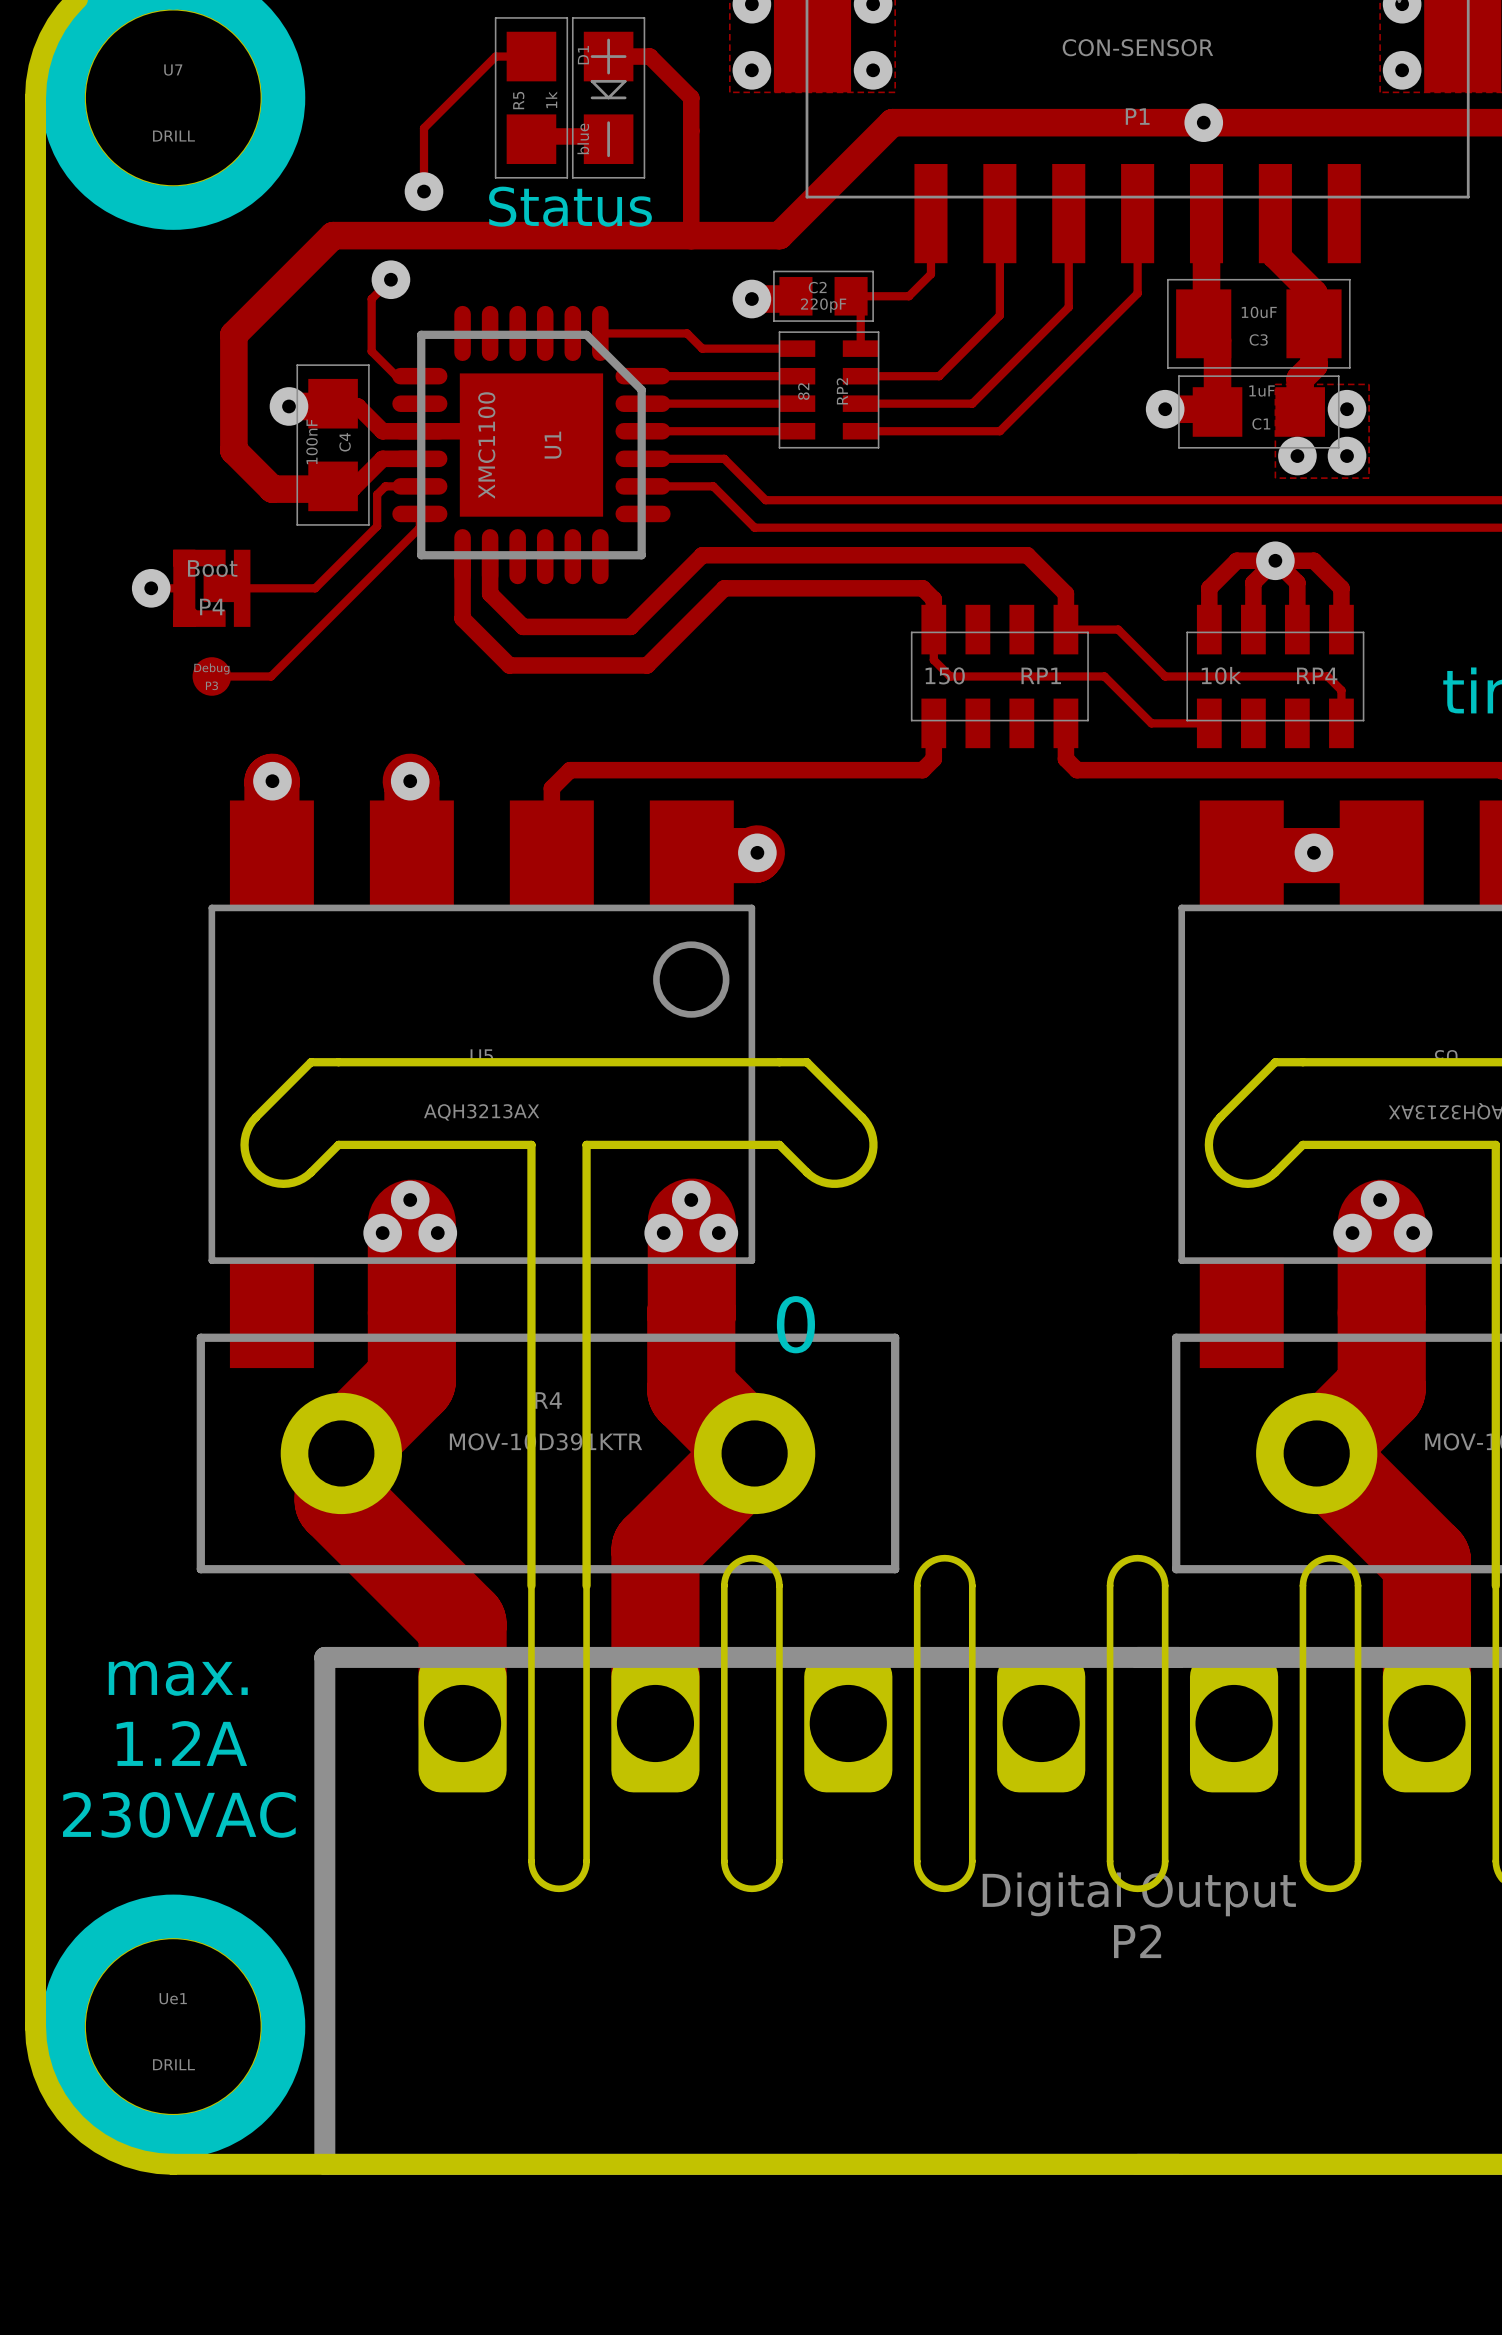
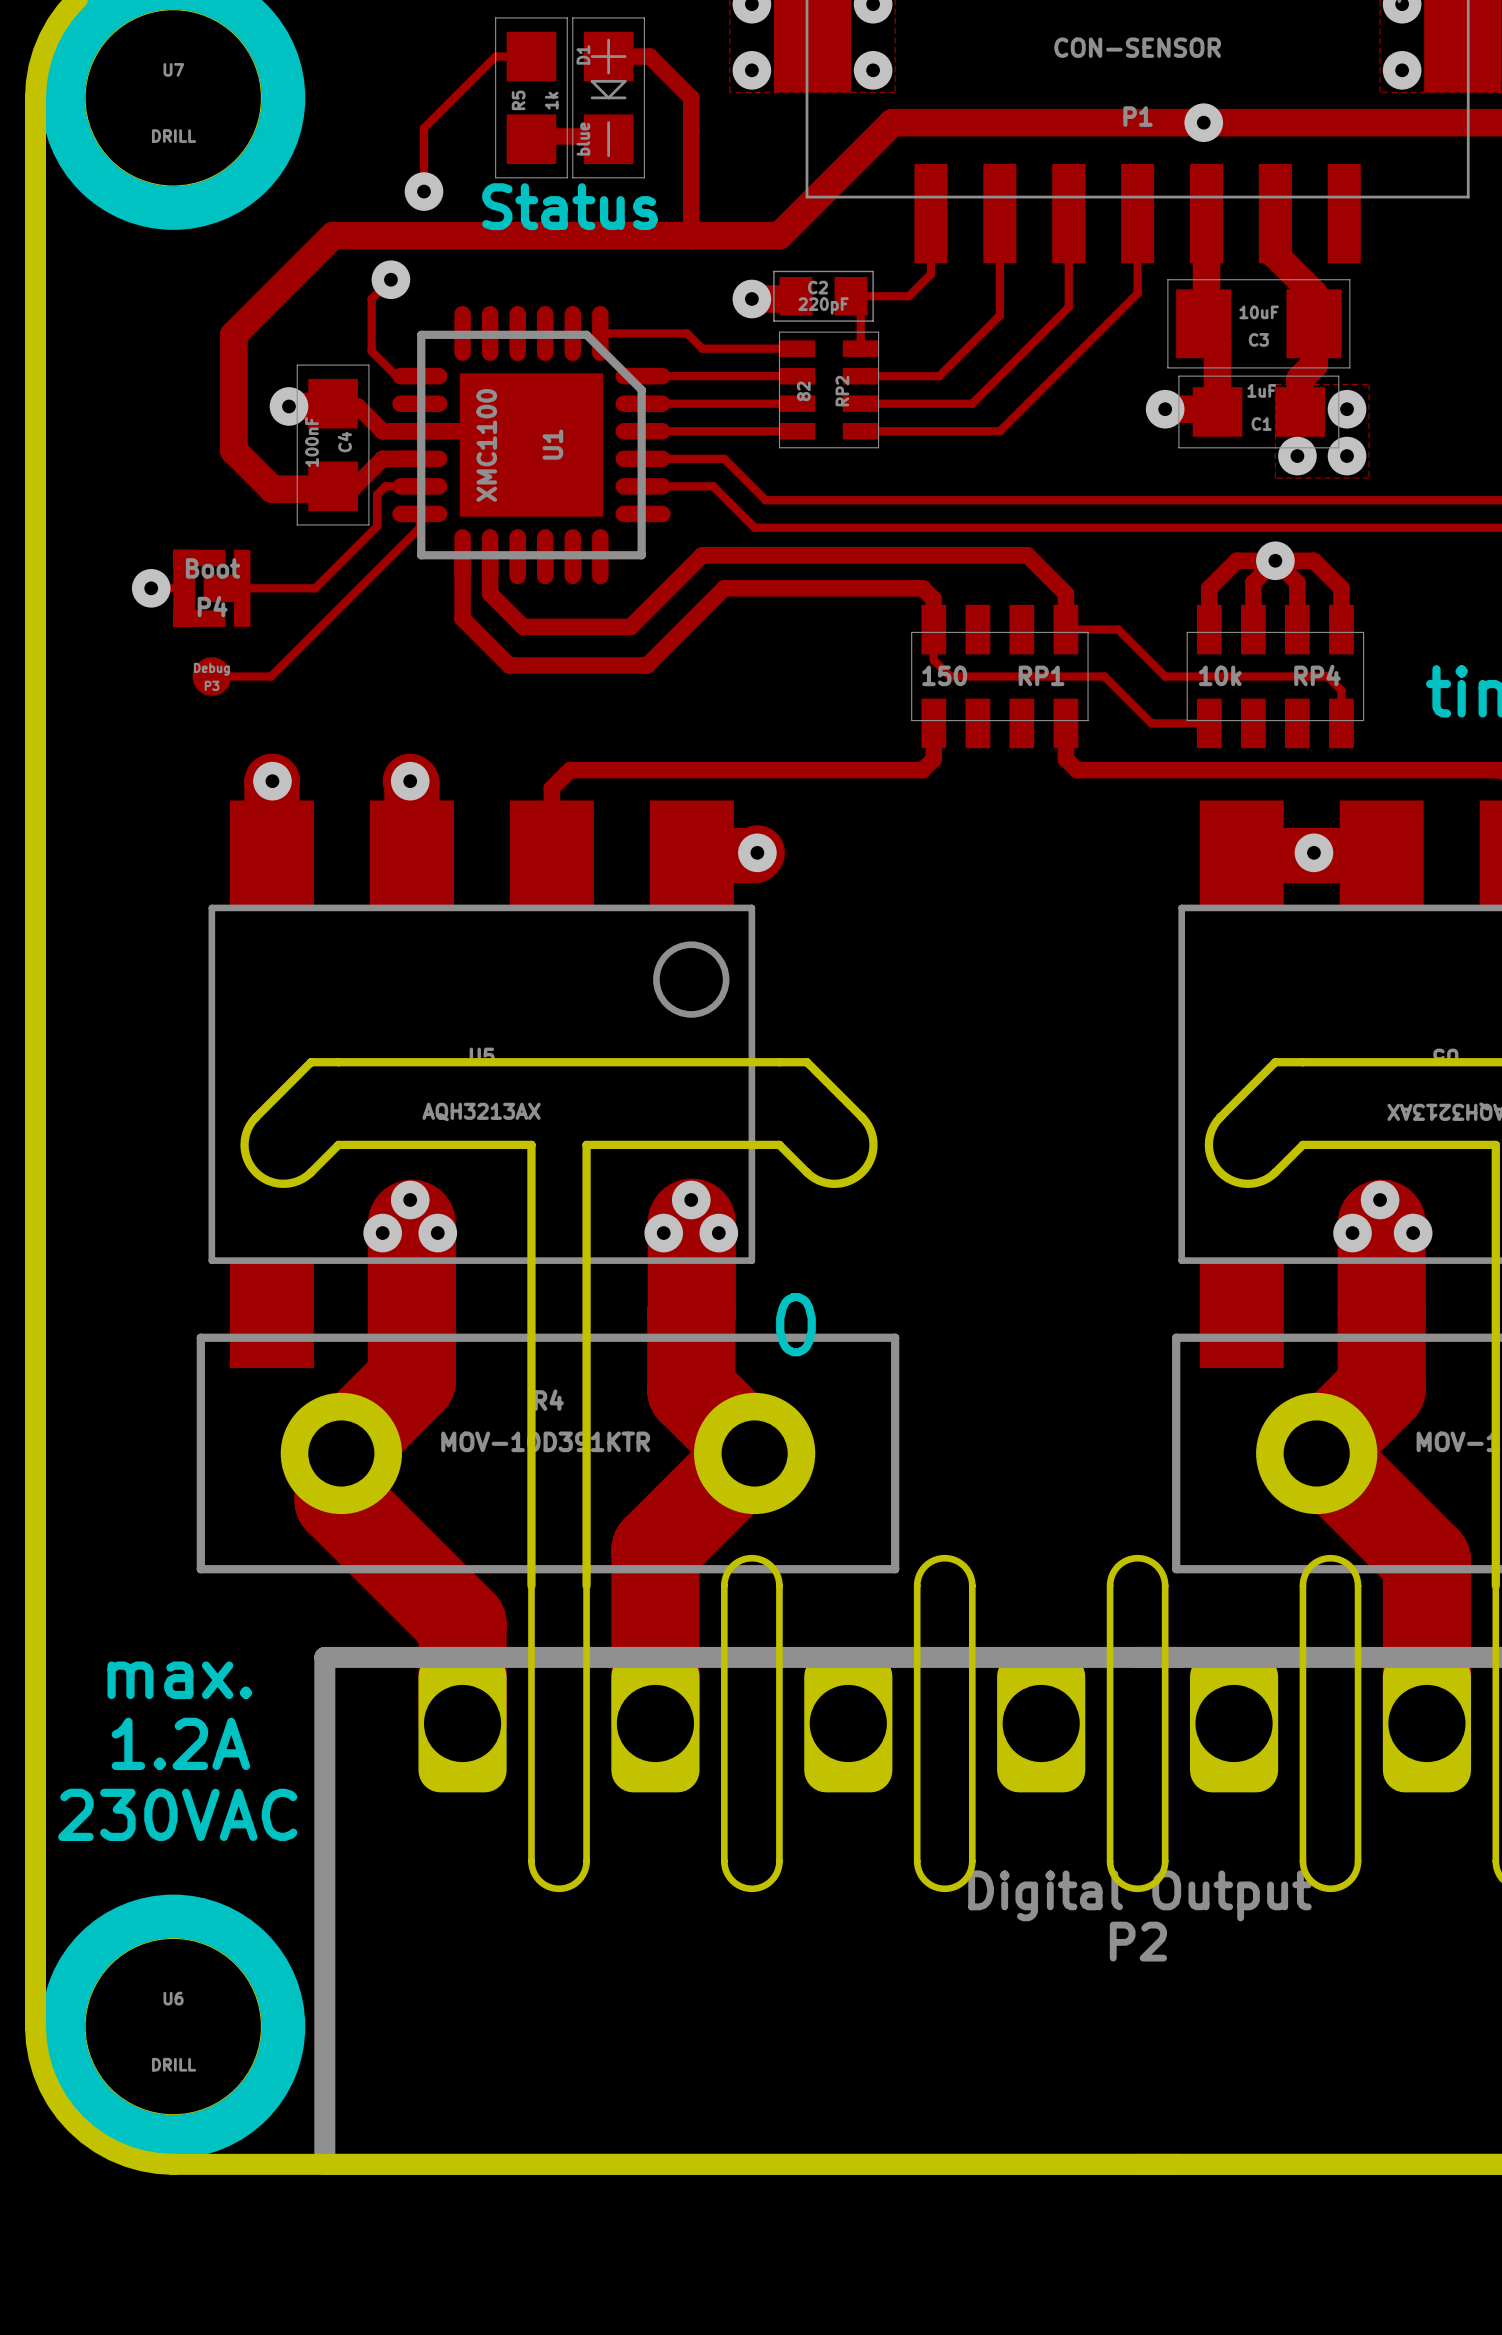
Ue1 name: Ue1 (173, 1998) -> U6 (173, 1998)

